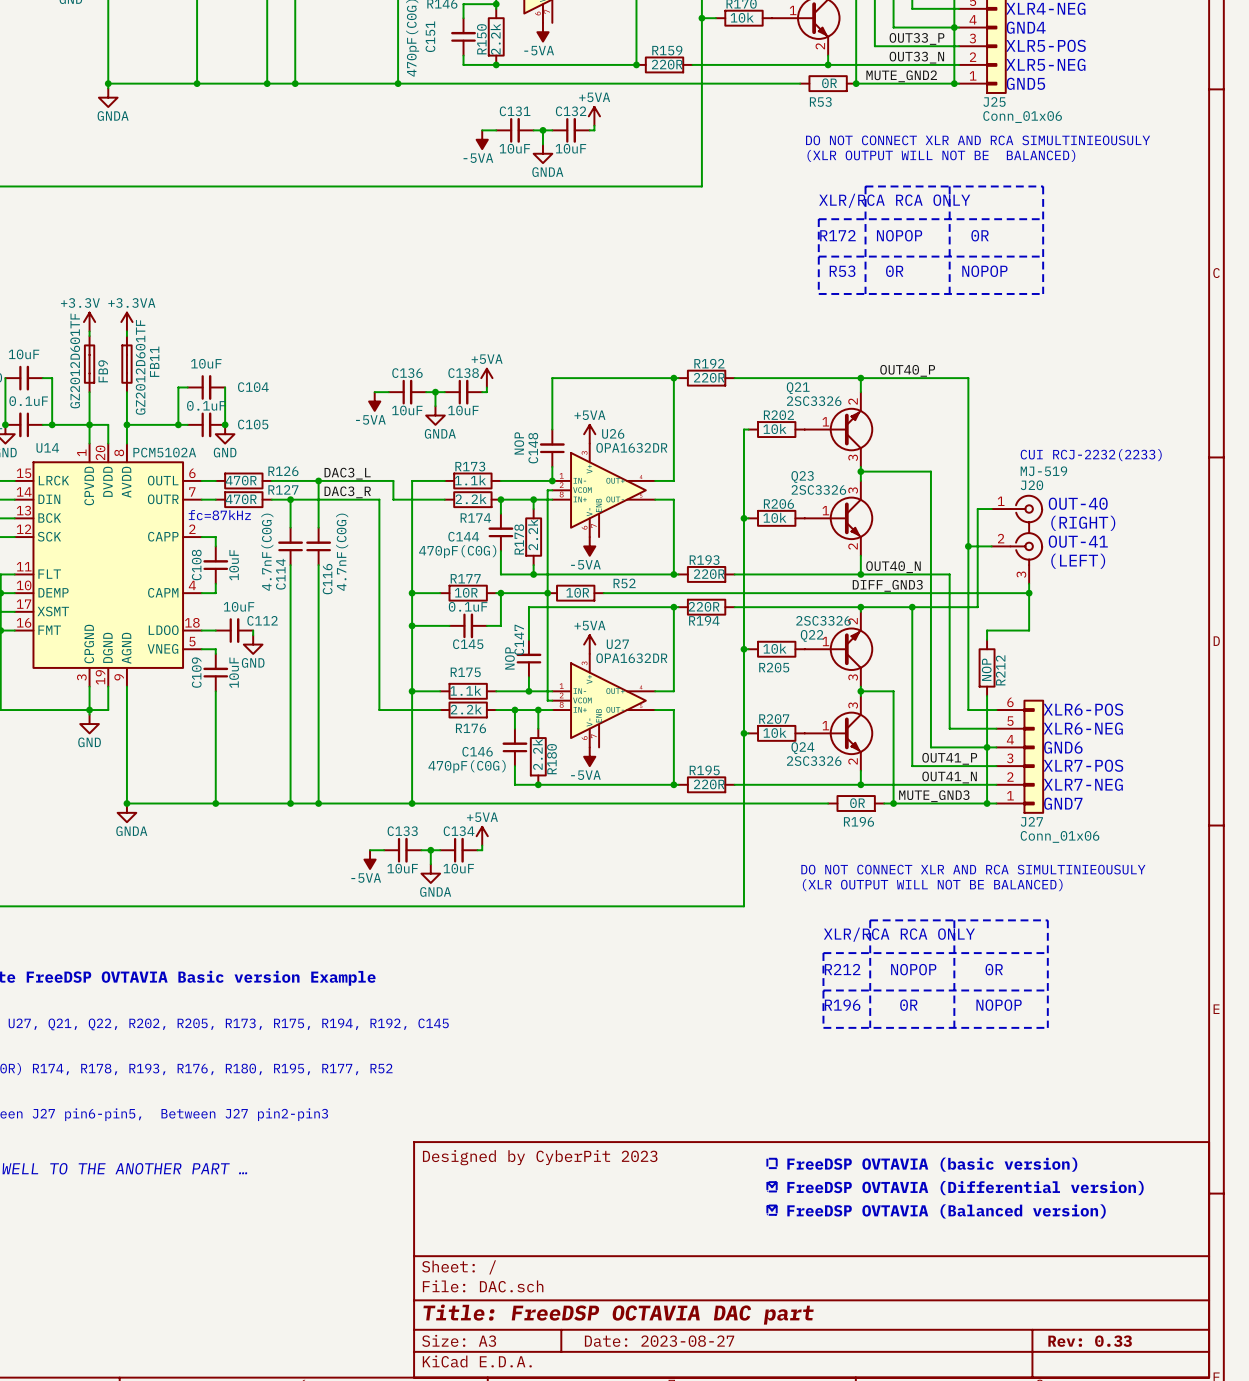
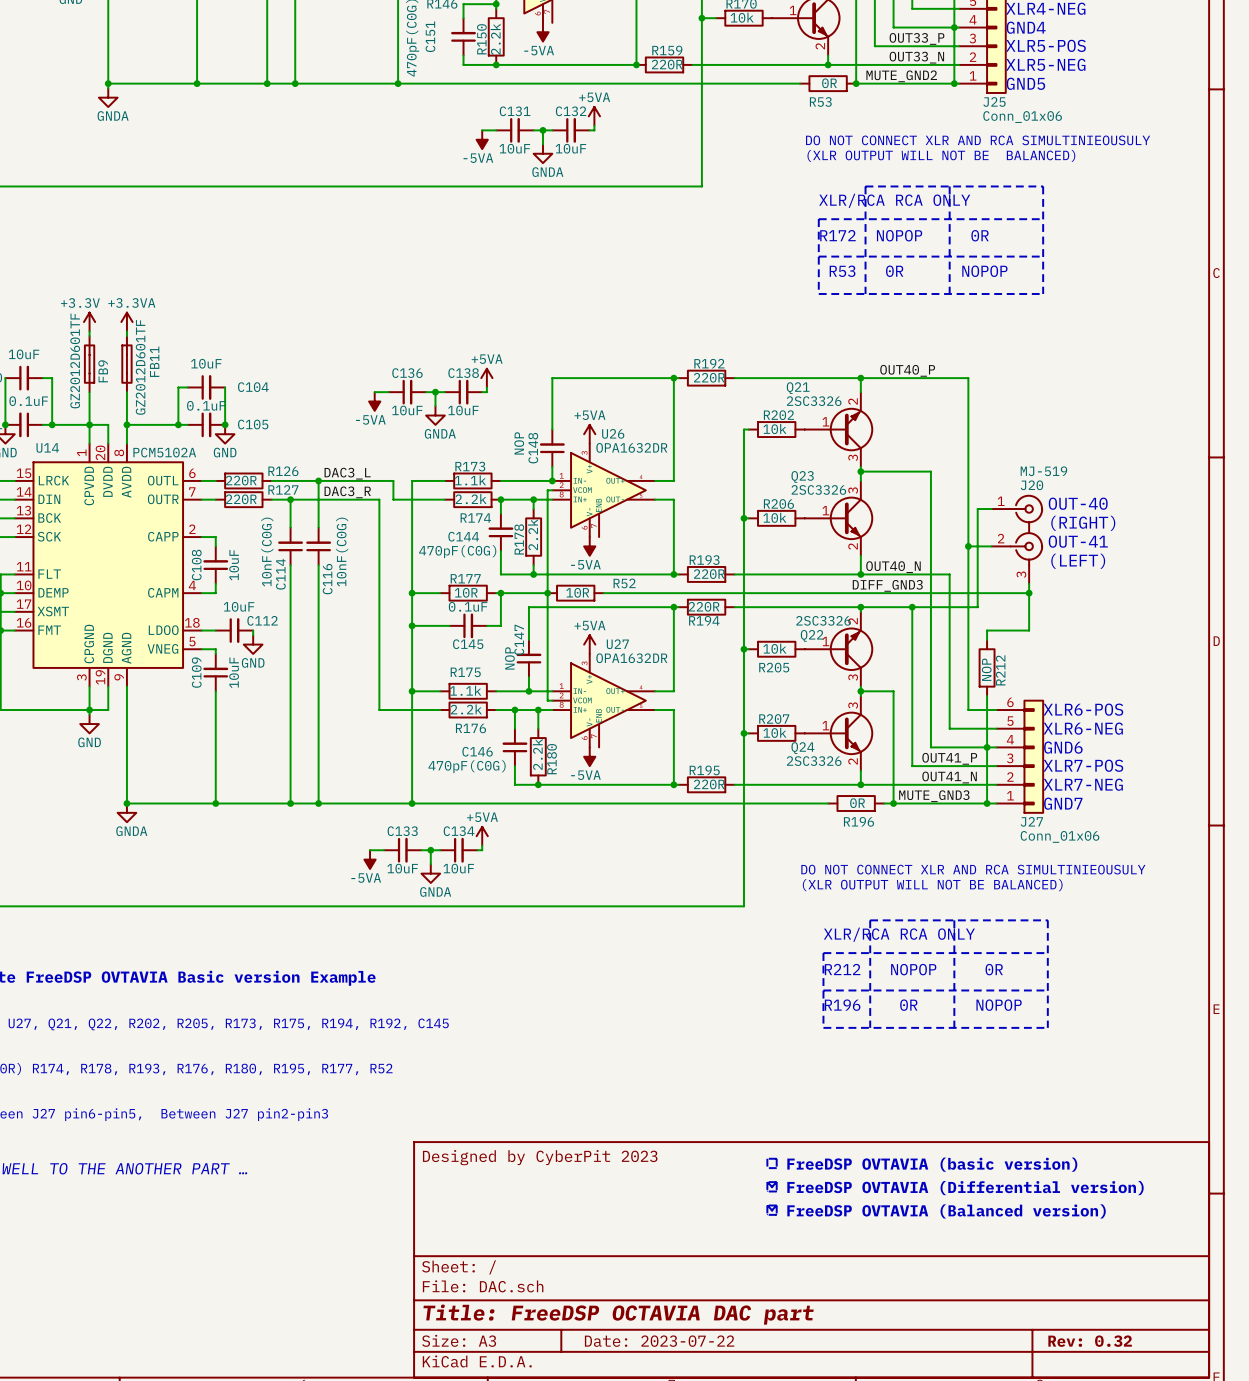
text: CUI RCJ-2232(2233) (1091, 455) -> none
R126 value: 470R (241, 480) -> 220R (241, 480)
R127 value: 470R (241, 499) -> 220R (241, 499)
text: fc=87kHz (219, 515) -> none
C114 value: 4.7nF(C0G) (267, 552) -> 10nF(C0G) (267, 552)
C116 value: 4.7nF(C0G) (342, 552) -> 10nF(C0G) (342, 552)
title block: Date: 2023-08-27 (659, 1341) -> Date: 2023-07-22 (659, 1341)
title block: Rev: 0.33 (1090, 1341) -> Rev: 0.32 (1090, 1341)

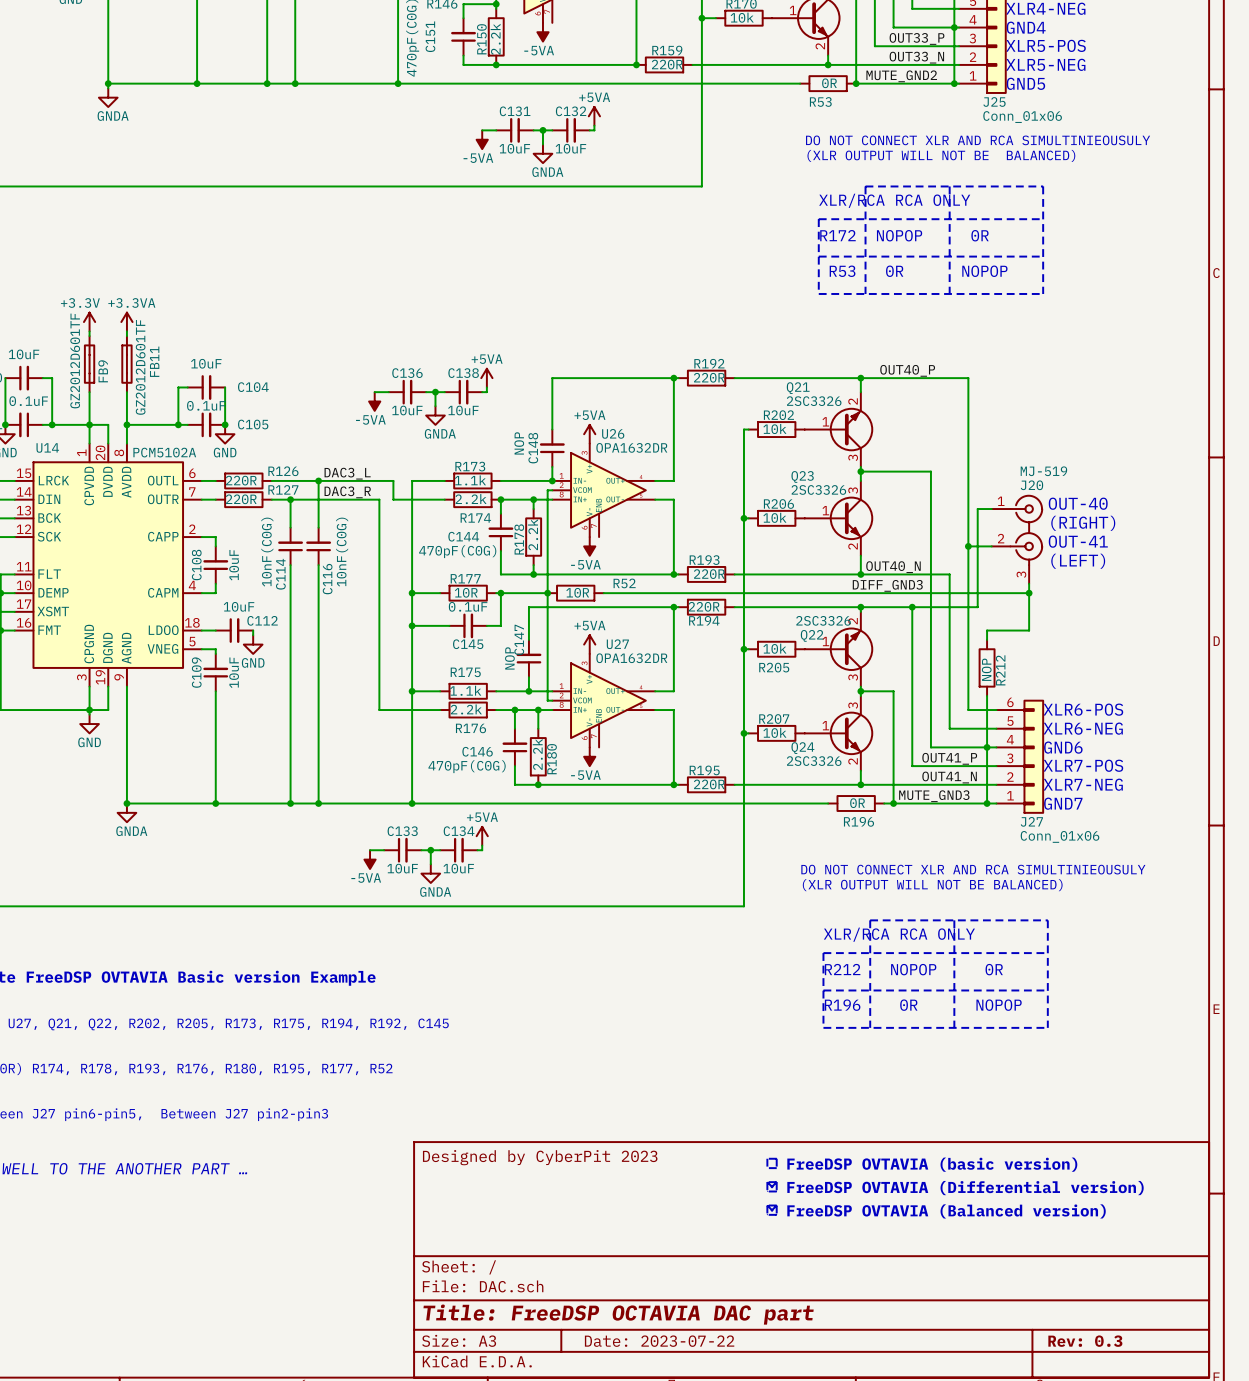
title block: Rev: 0.32 (1090, 1341) -> Rev: 0.3 (1085, 1341)

